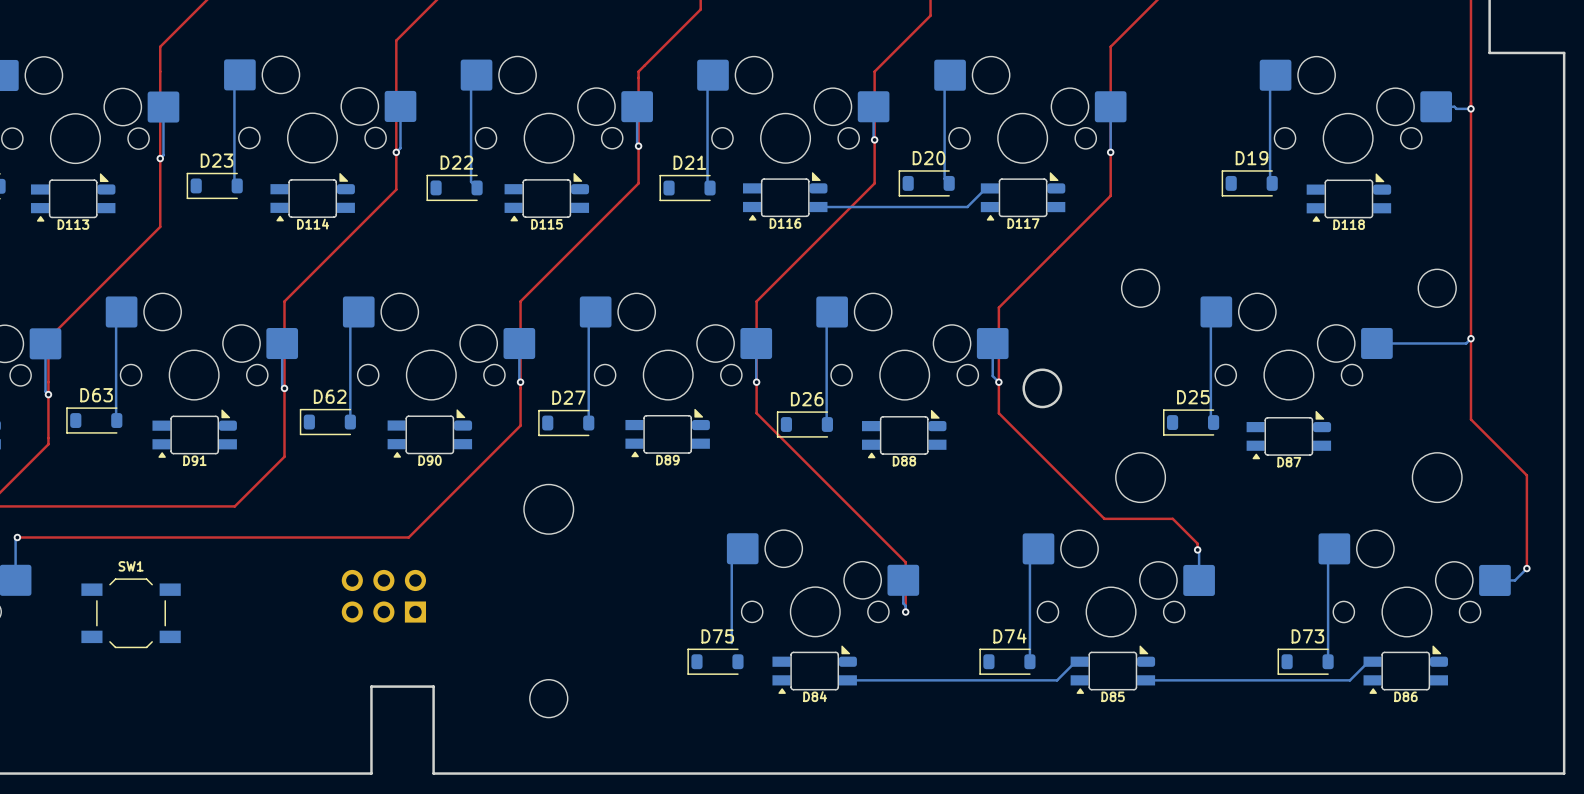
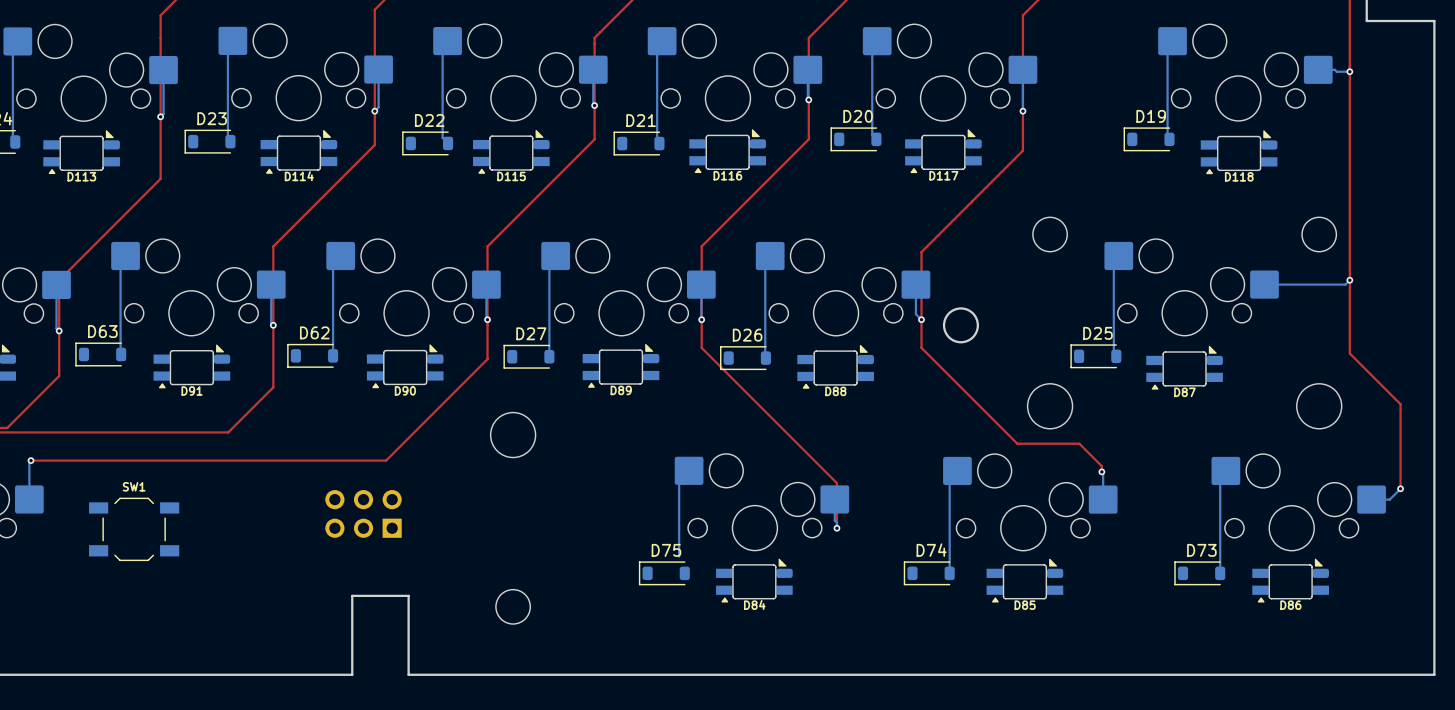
bottom track: (989, 188) (985, 188) (967, 207) (818, 207) -> none
bottom track: (1079, 661) (1075, 661) (1057, 680) (847, 680) -> none
bottom track: (1372, 661) (1368, 661) (1349, 680) (1146, 680) -> none

